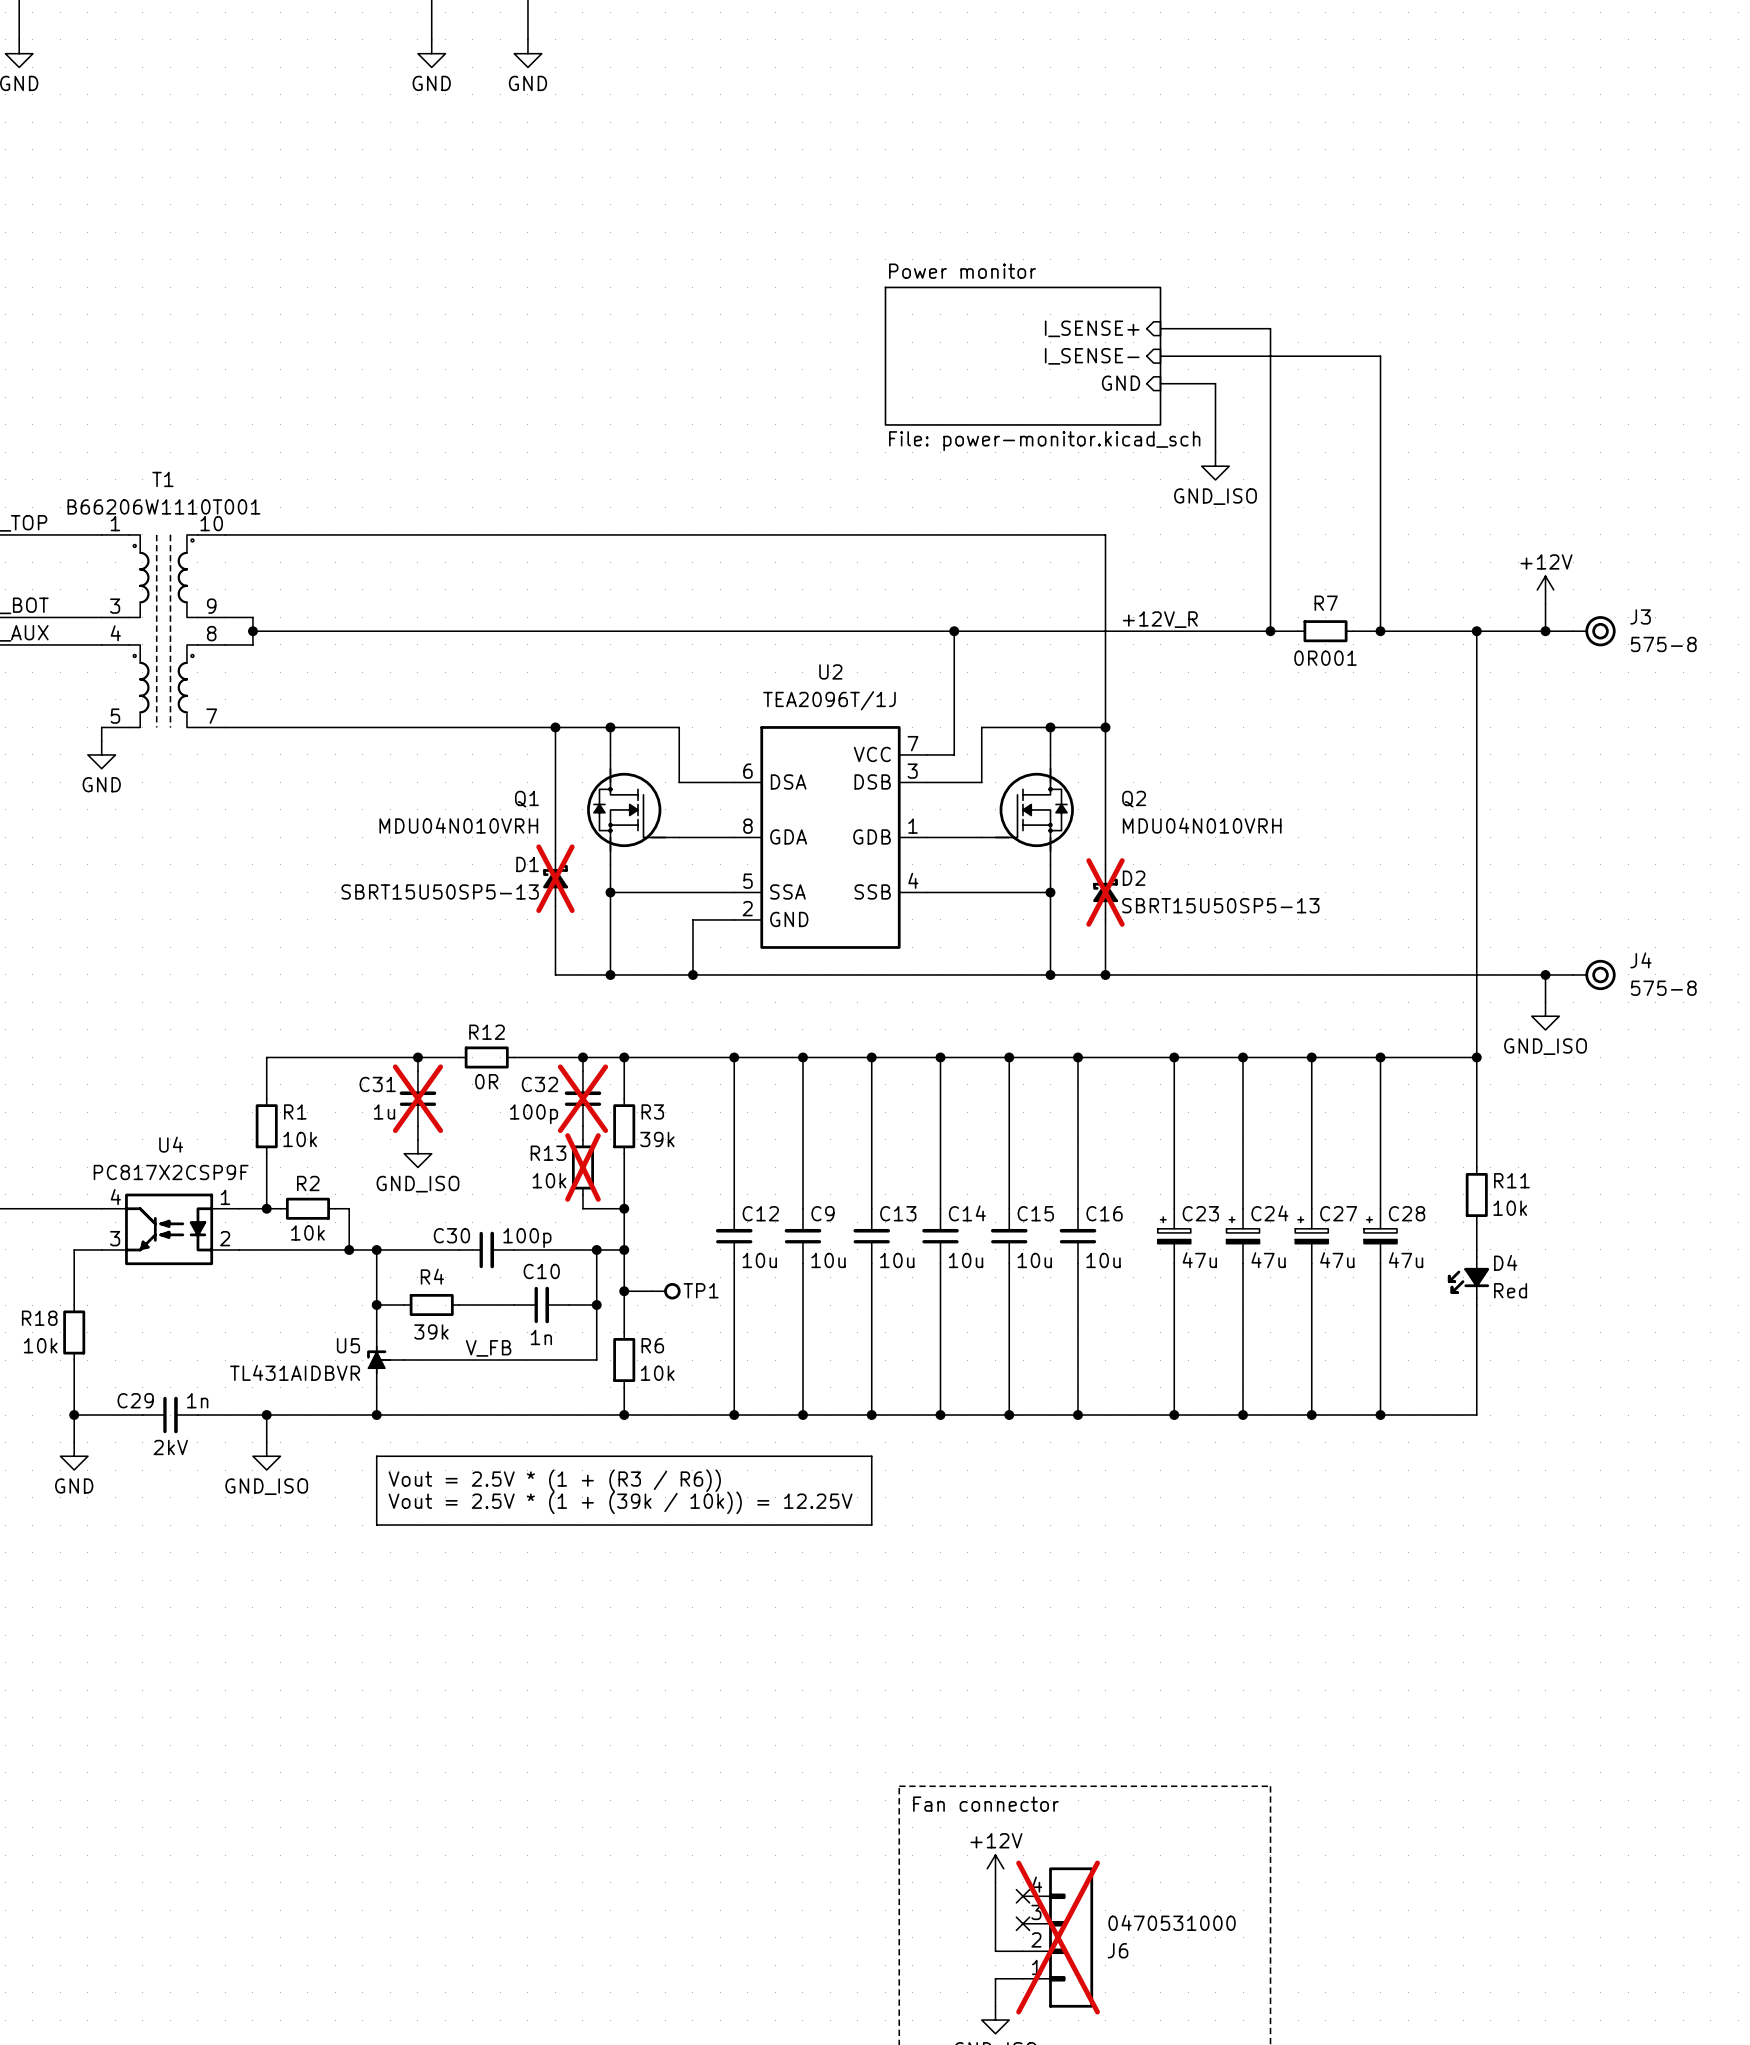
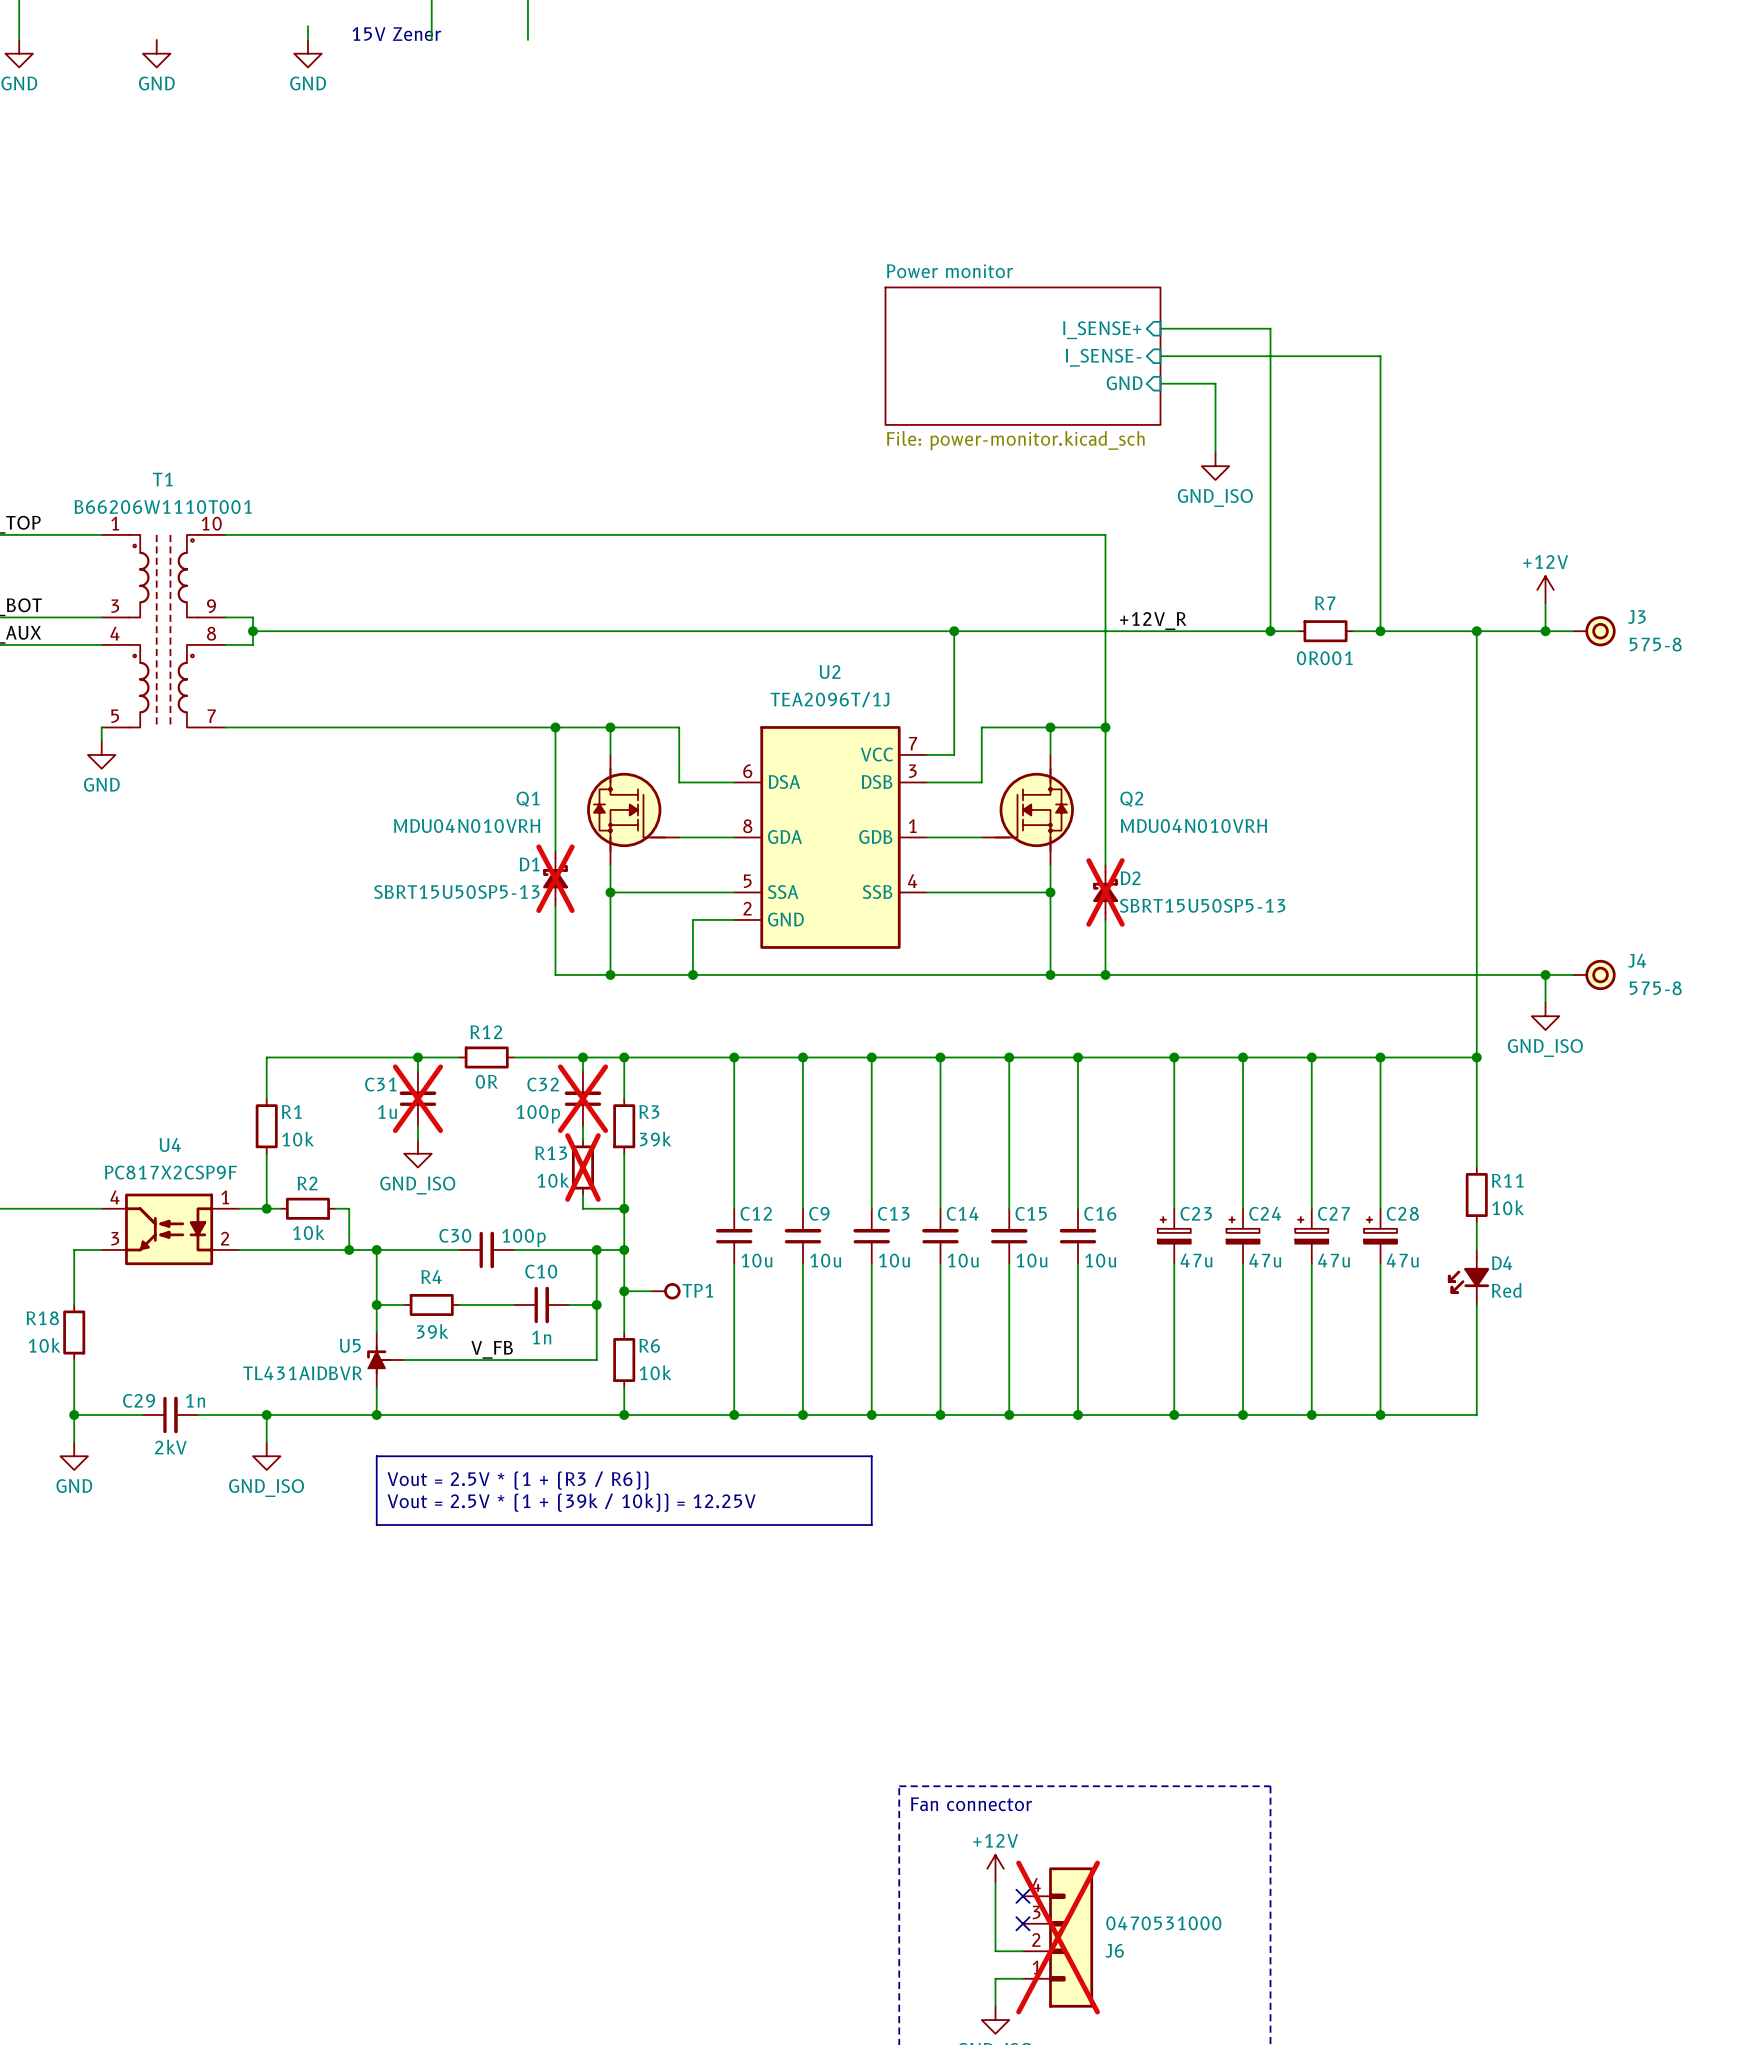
wire: none -> (307, 26) (307, 39)
text: none -> 15V Zener (396, 34)
power symbol: none -> GND (156, 53)
power symbol: none -> GND (307, 53)
power symbol: GND (431, 53) -> none
power symbol: GND (527, 53) -> none

